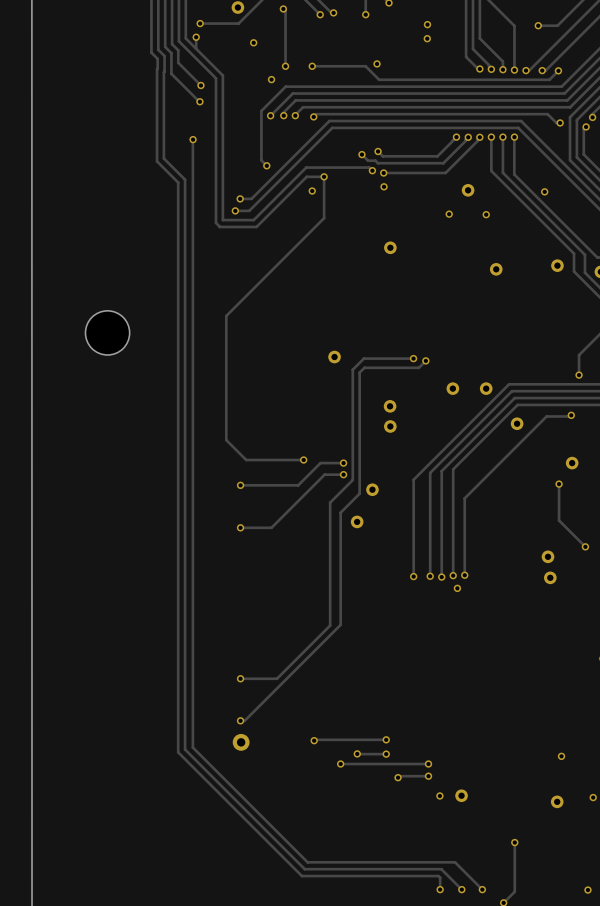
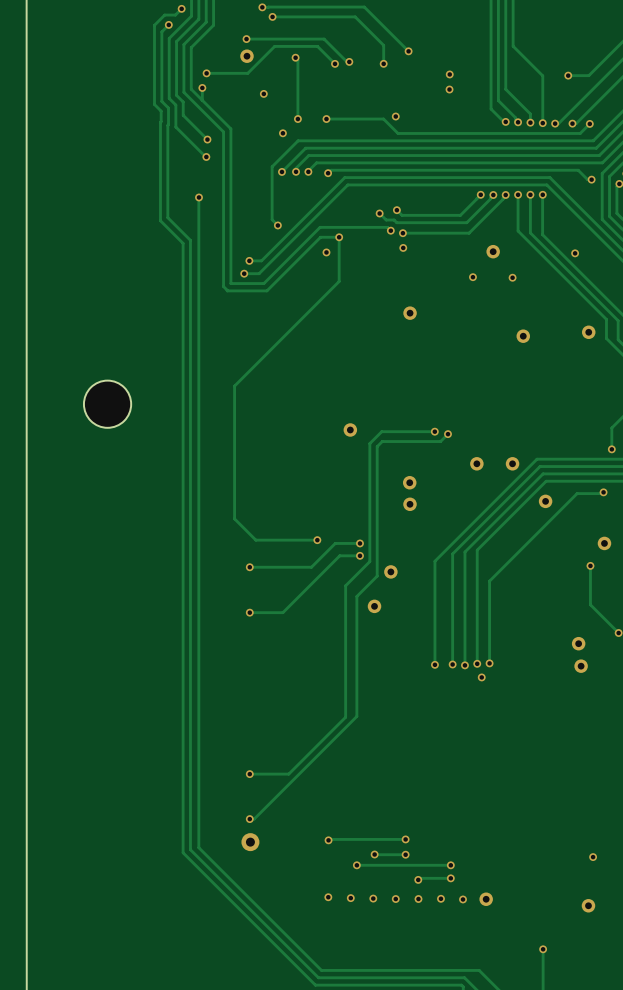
via: none -> (328, 897)
via: none -> (350, 898)
via: none -> (373, 898)
via: none -> (395, 899)
via: none -> (418, 899)
via: none -> (440, 898)

